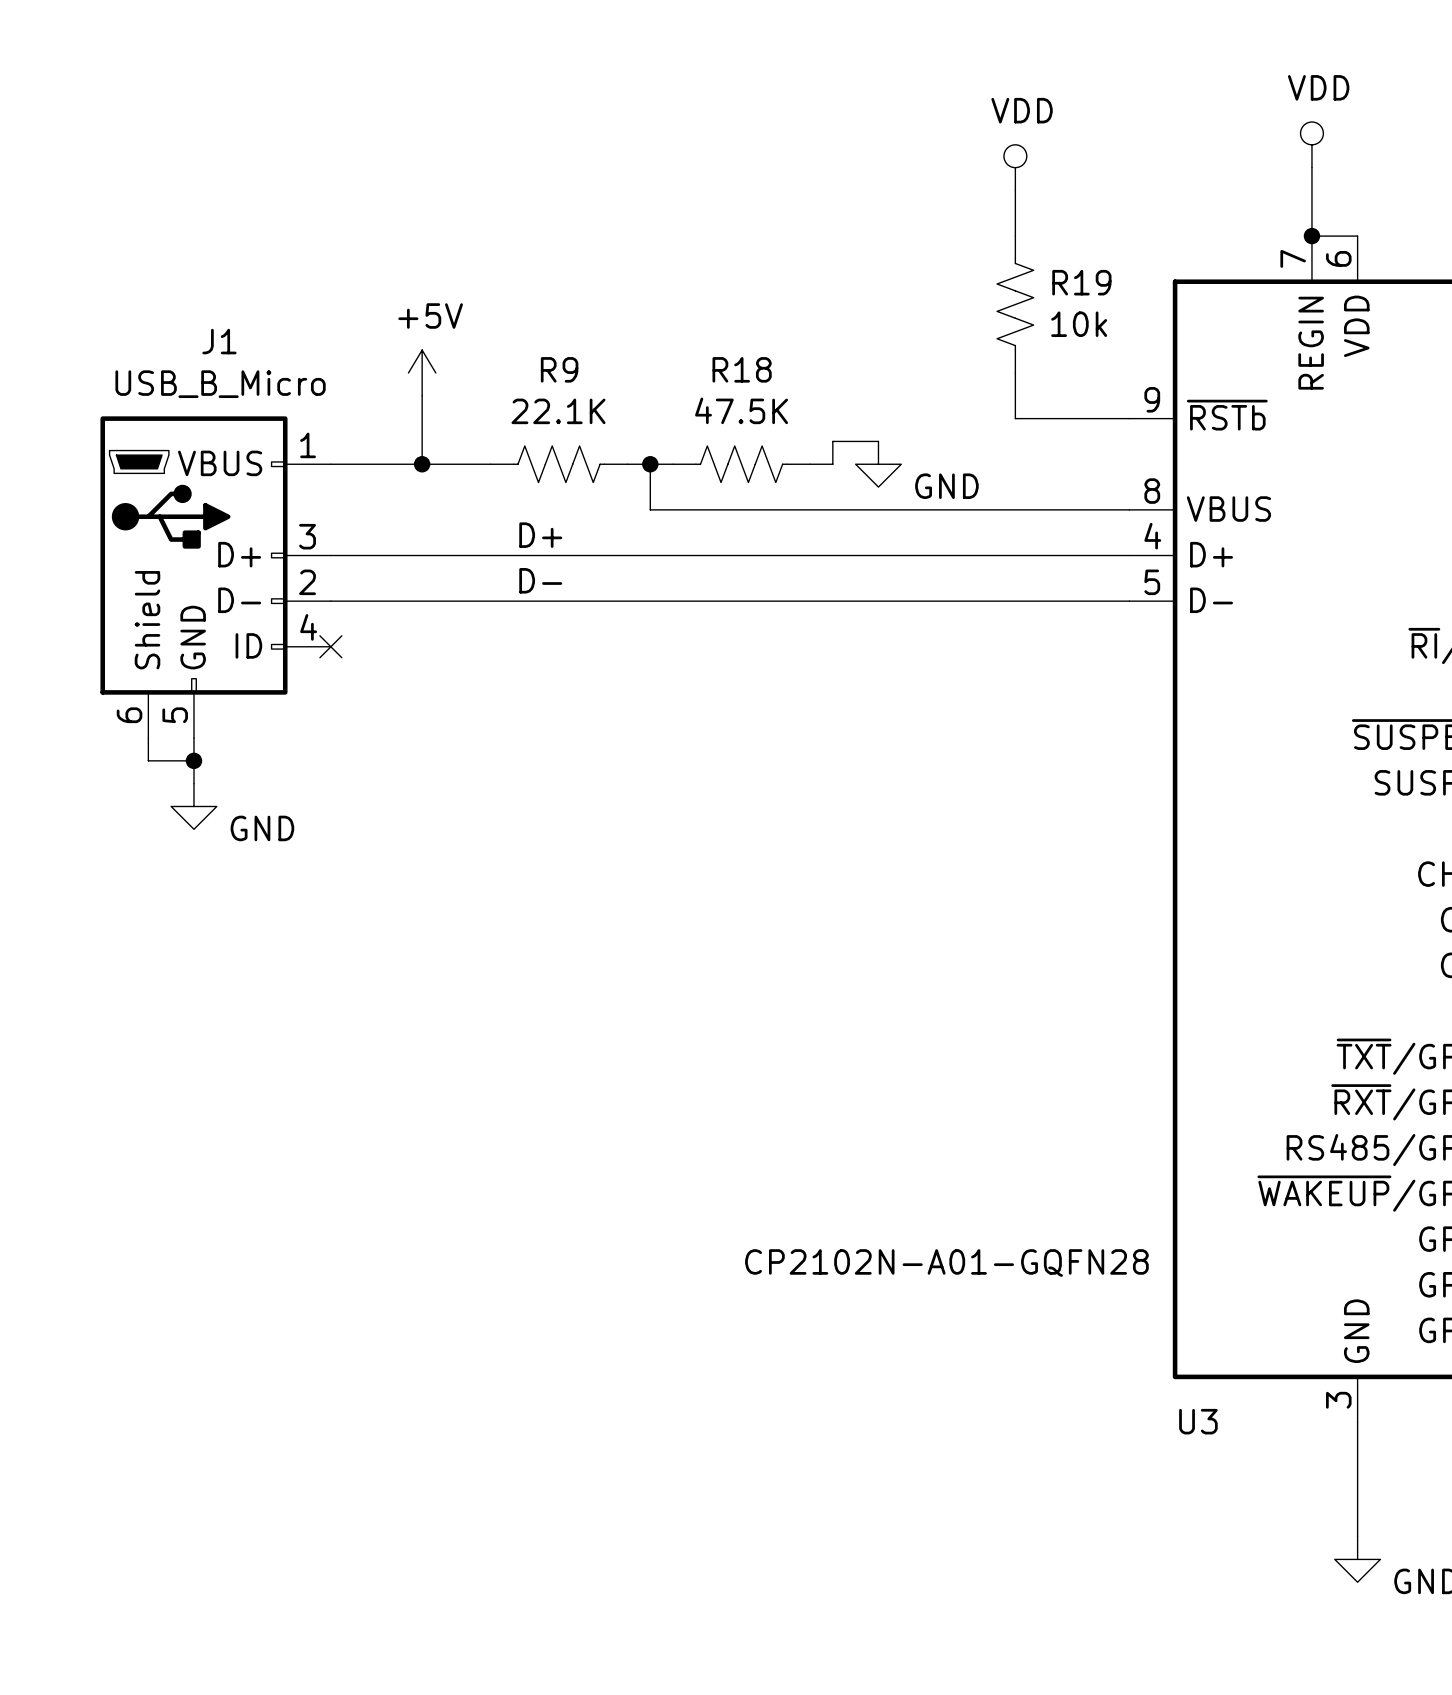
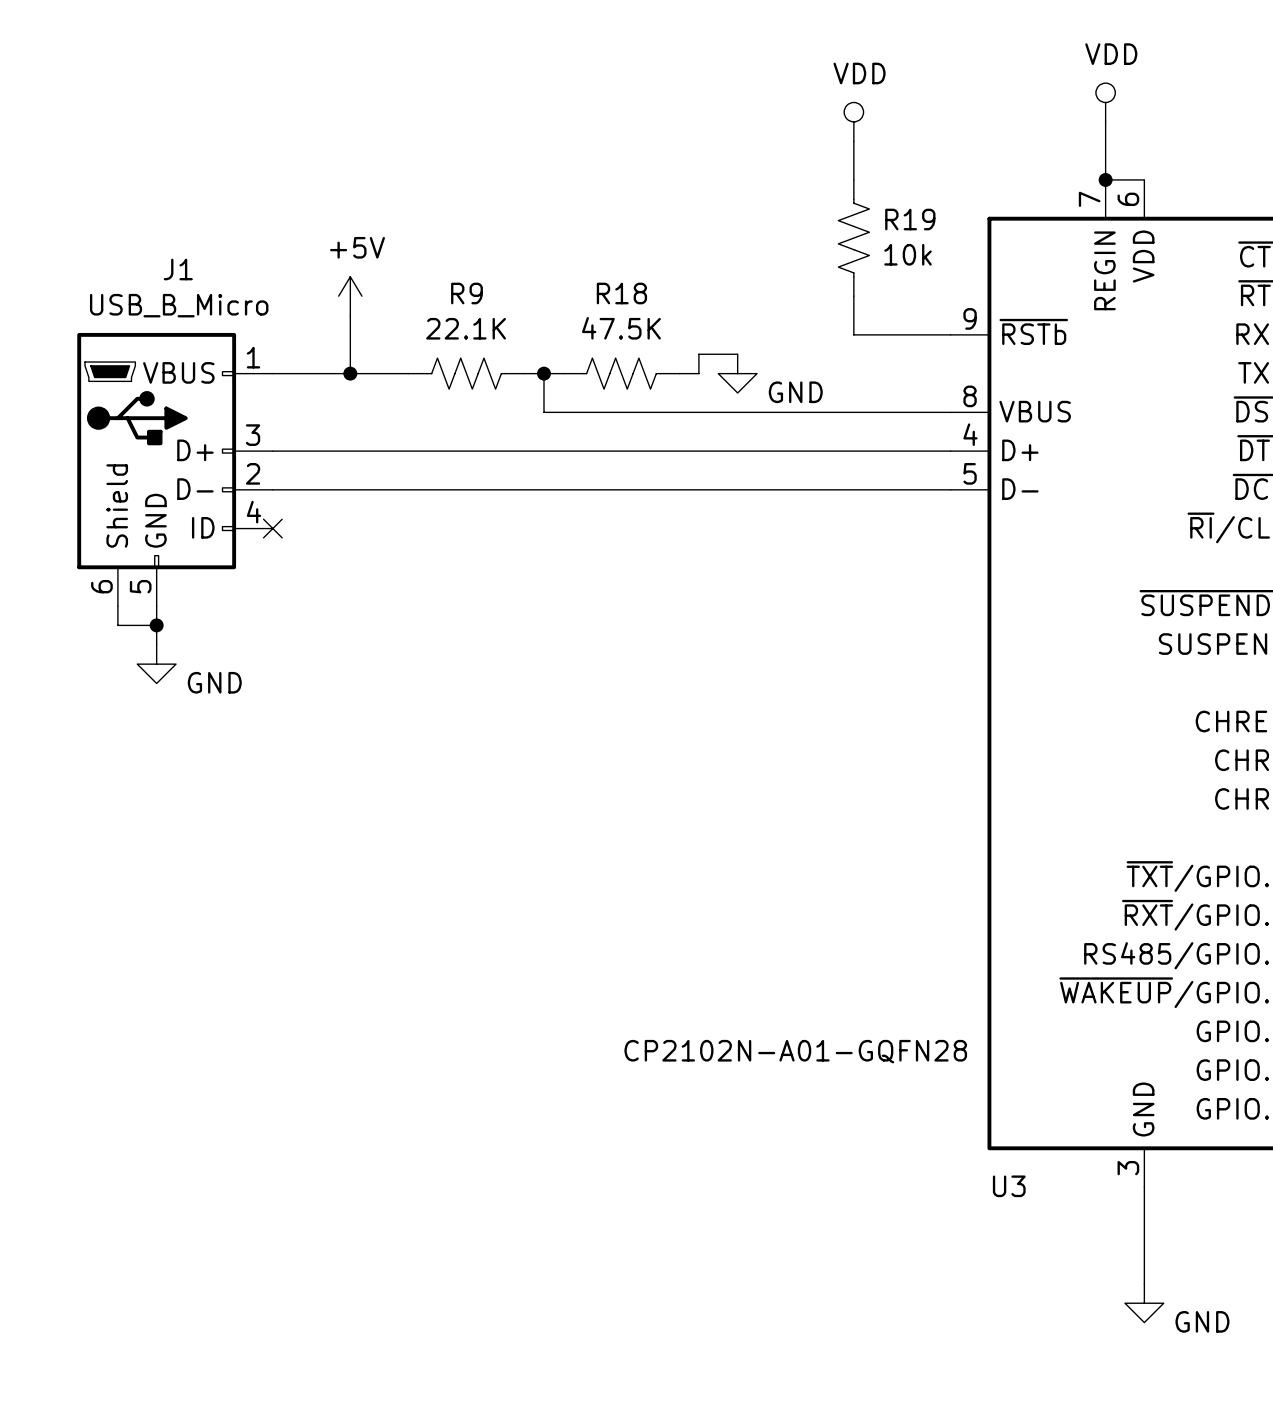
label: D+ (540, 535) -> none
label: D- (540, 580) -> none

